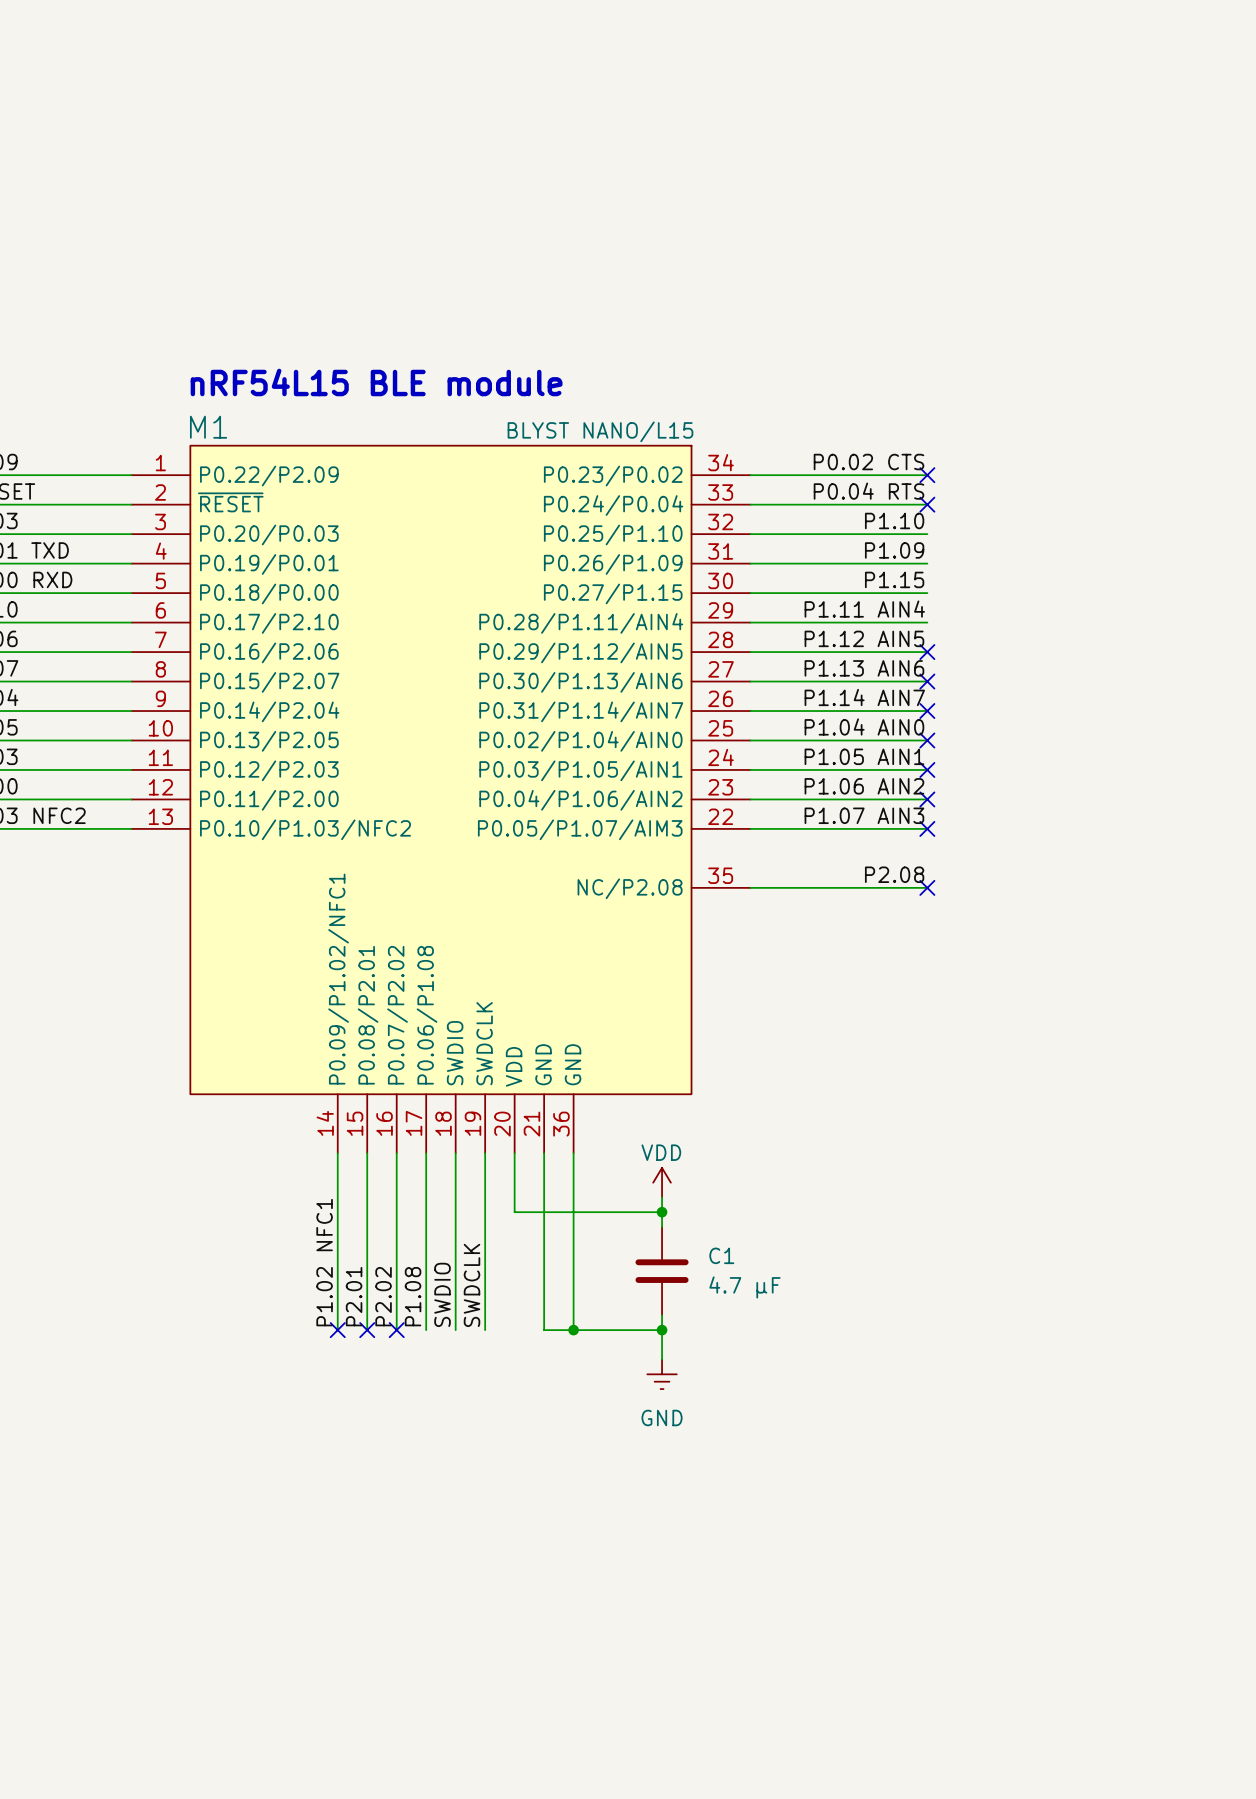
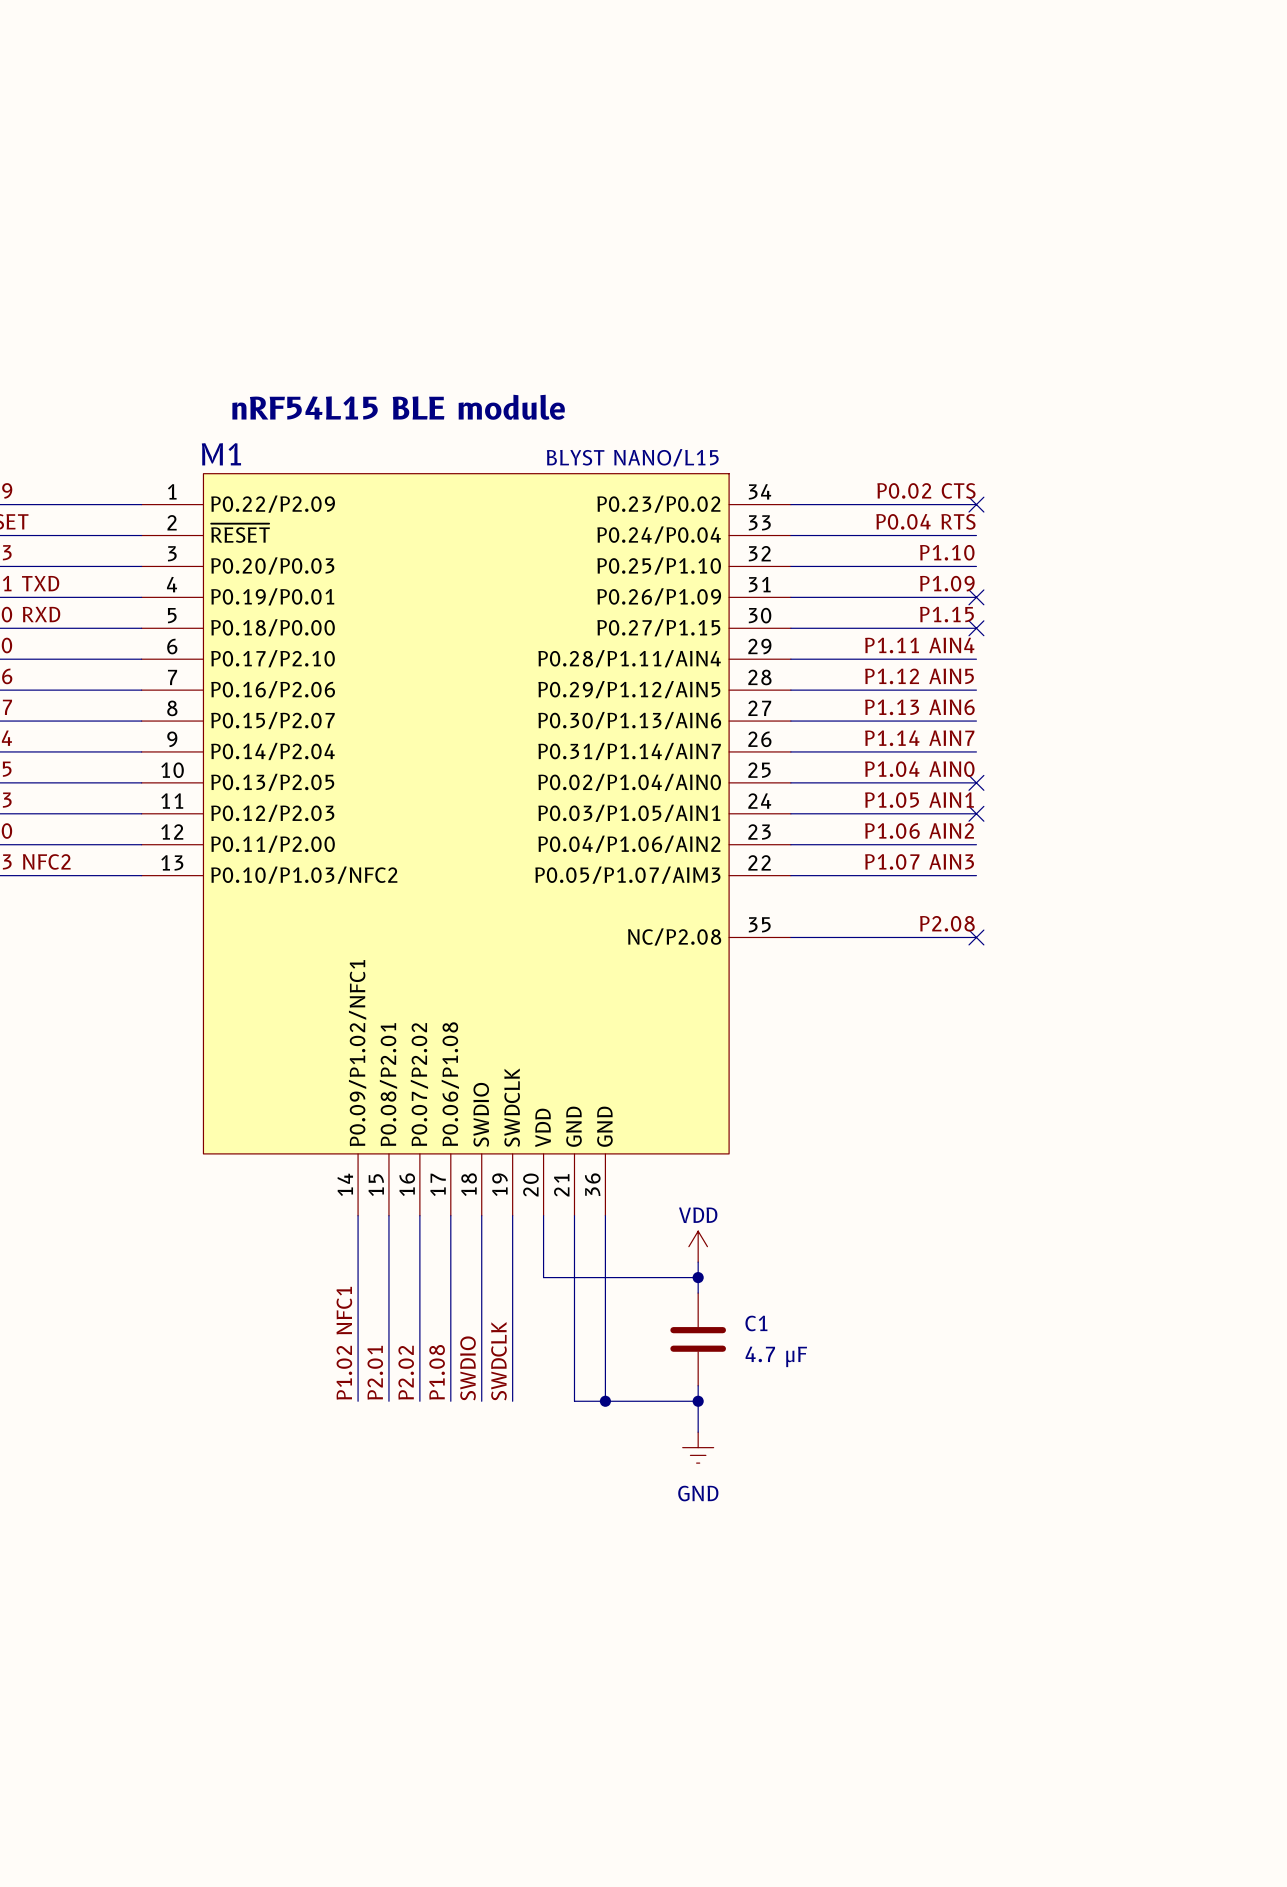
no-connect mark: (927, 504) -> none
no-connect mark: none -> (976, 597)
no-connect mark: none -> (976, 628)
no-connect mark: (927, 652) -> none
no-connect mark: (927, 681) -> none
no-connect mark: (927, 711) -> none
no-connect mark: (927, 799) -> none
no-connect mark: (927, 828) -> none
no-connect mark: (337, 1330) -> none
no-connect mark: (367, 1330) -> none
no-connect mark: (396, 1330) -> none

